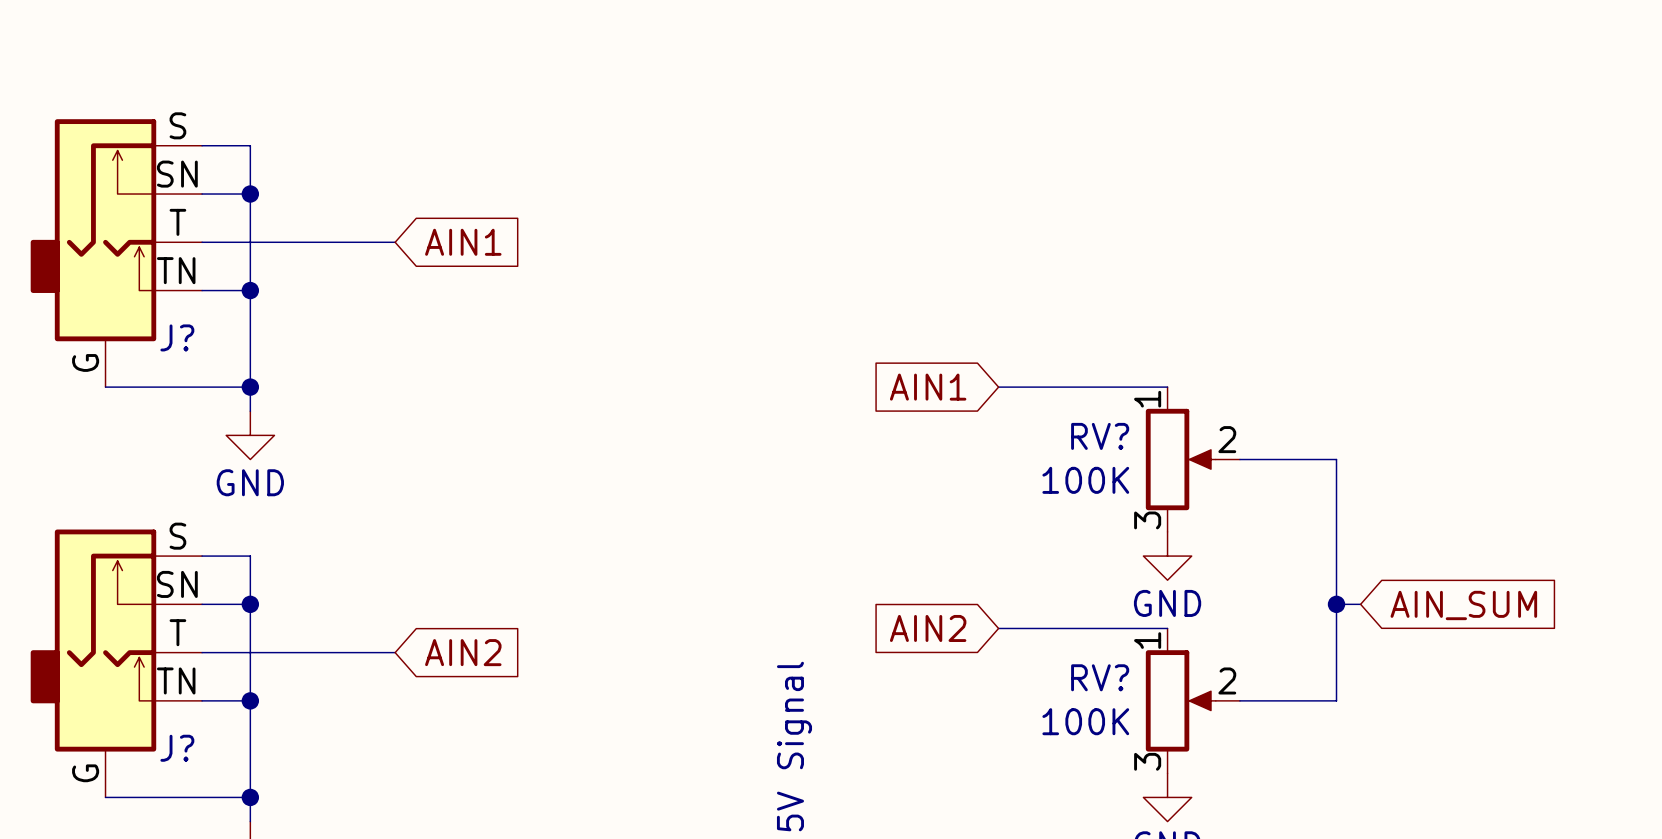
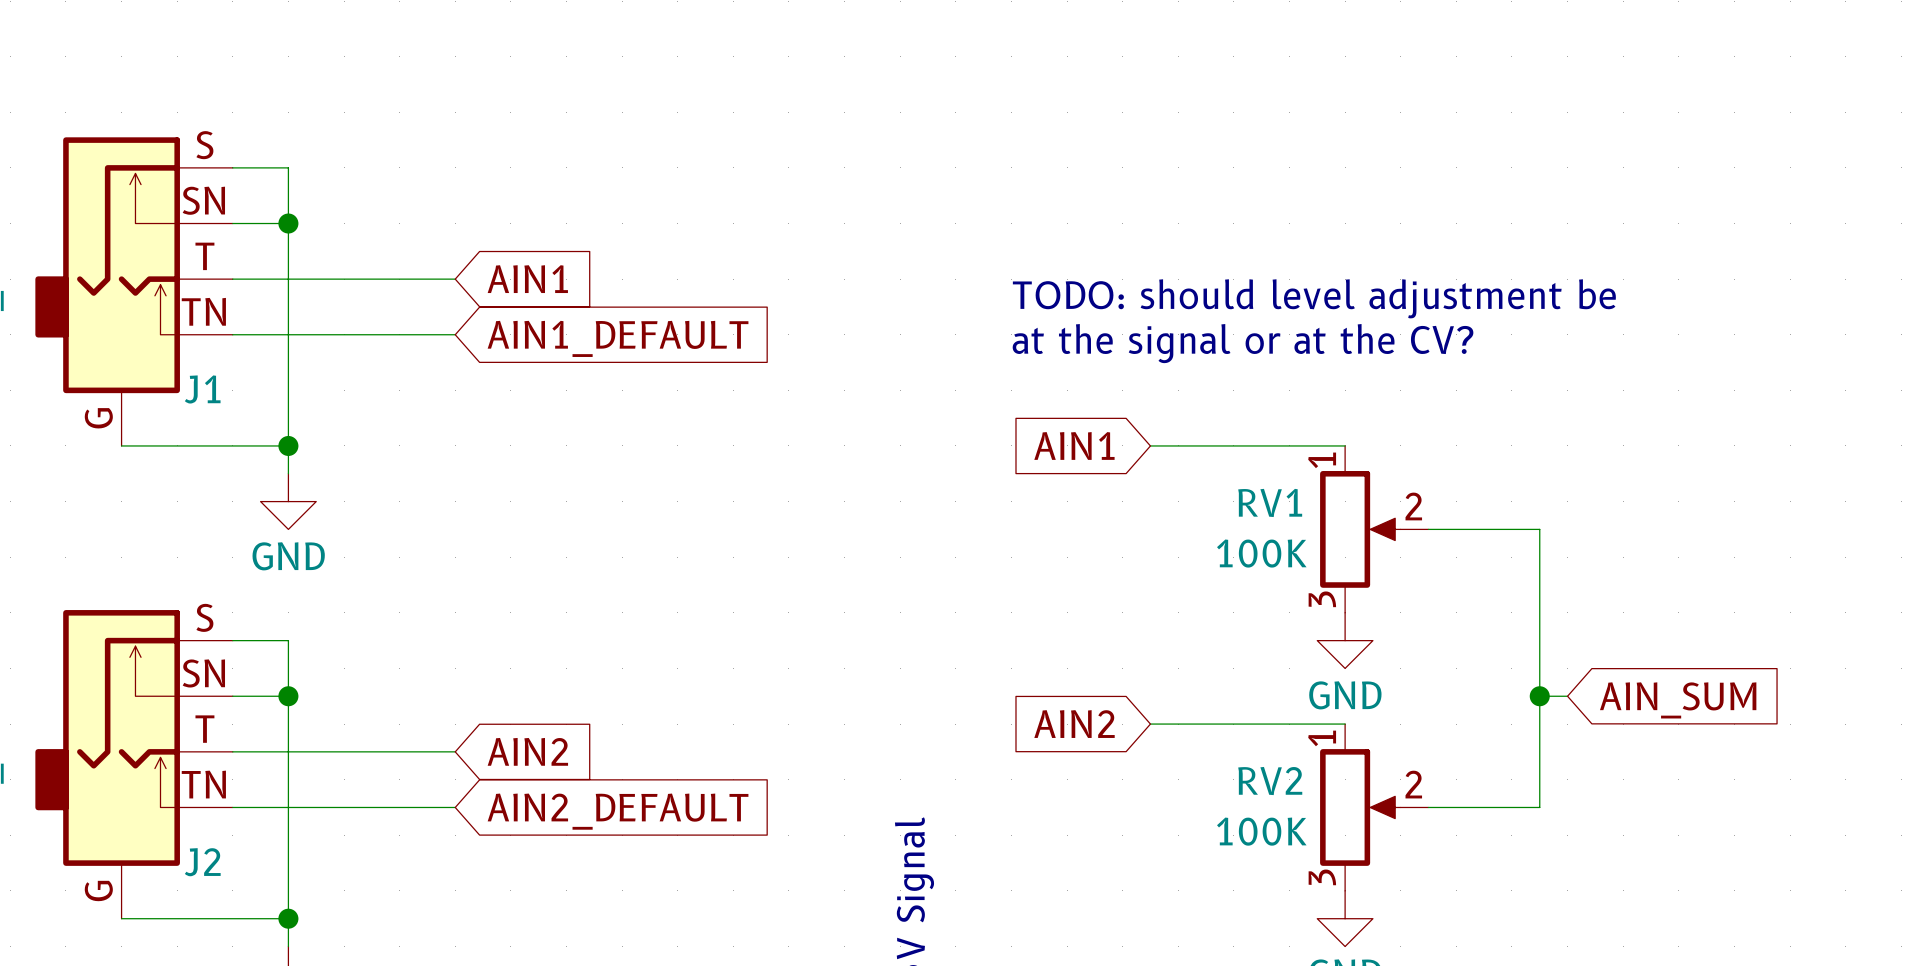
text: none -> TODO: should level adjustment be (1314, 298)
wire: none -> (288, 334) (455, 334)
junction: (250, 290) -> none
global label: none -> AIN1_DEFAULT (618, 338)
text: none -> at the signal or at the CV? (1243, 343)
J? name: J? (177, 337) -> J1 (202, 389)
RV? name: RV? (1100, 436) -> RV1 (1270, 502)
RV? name: RV? (1100, 677) -> RV2 (1270, 781)
wire: none -> (288, 807) (455, 807)
junction: (250, 700) -> none
global label: none -> AIN2_DEFAULT (618, 811)
J? name: J? (177, 748) -> J2 (202, 862)

